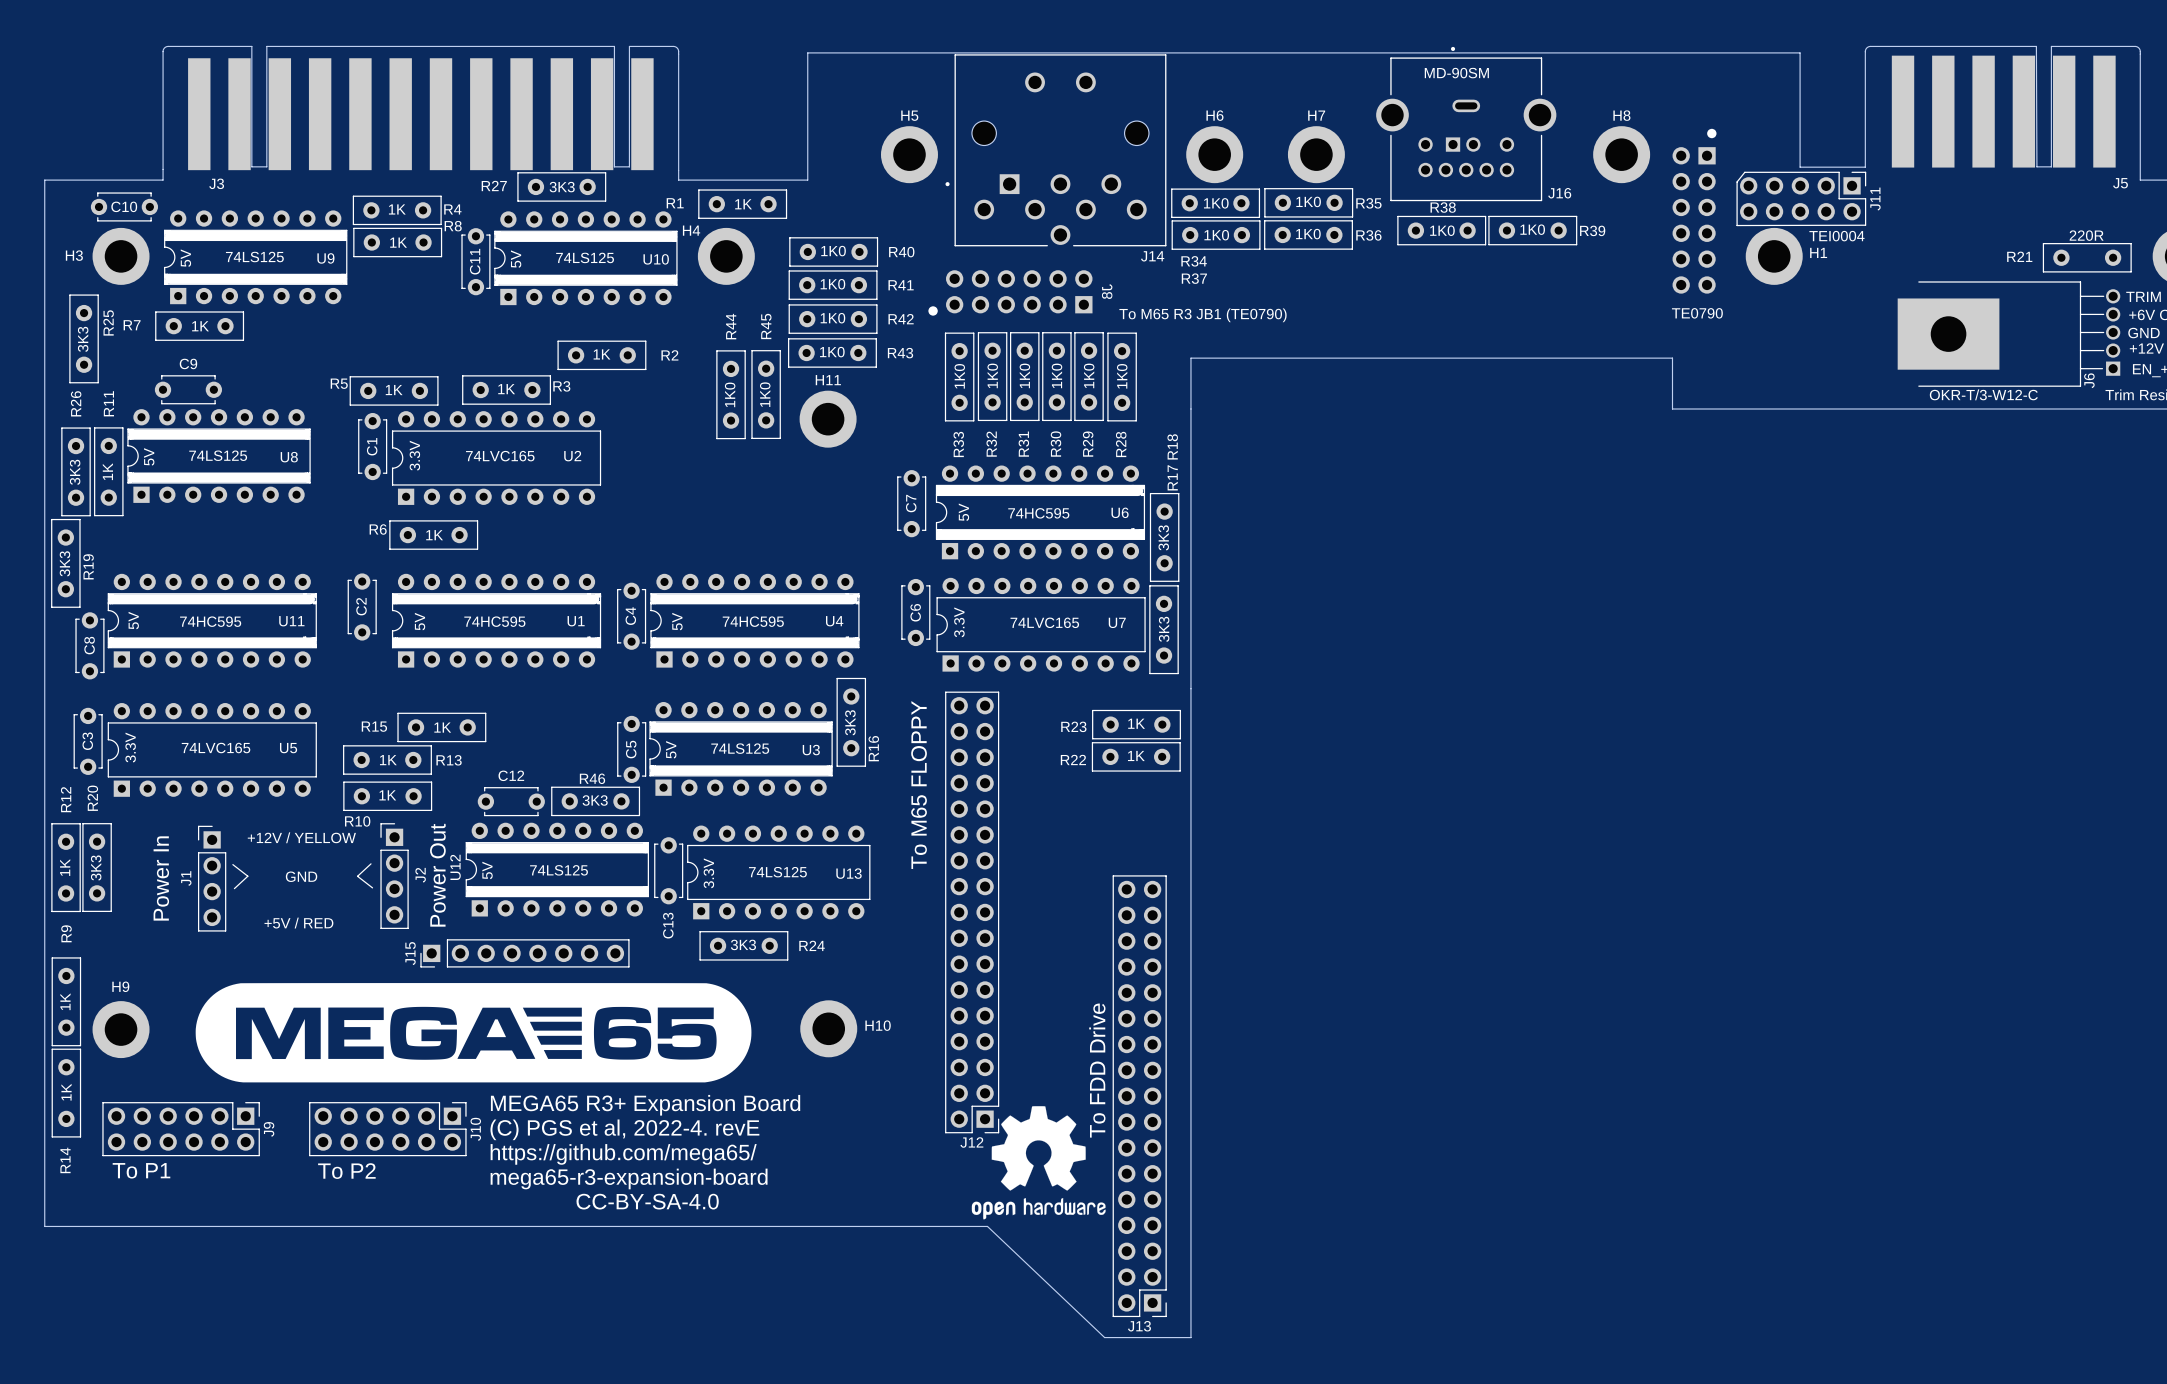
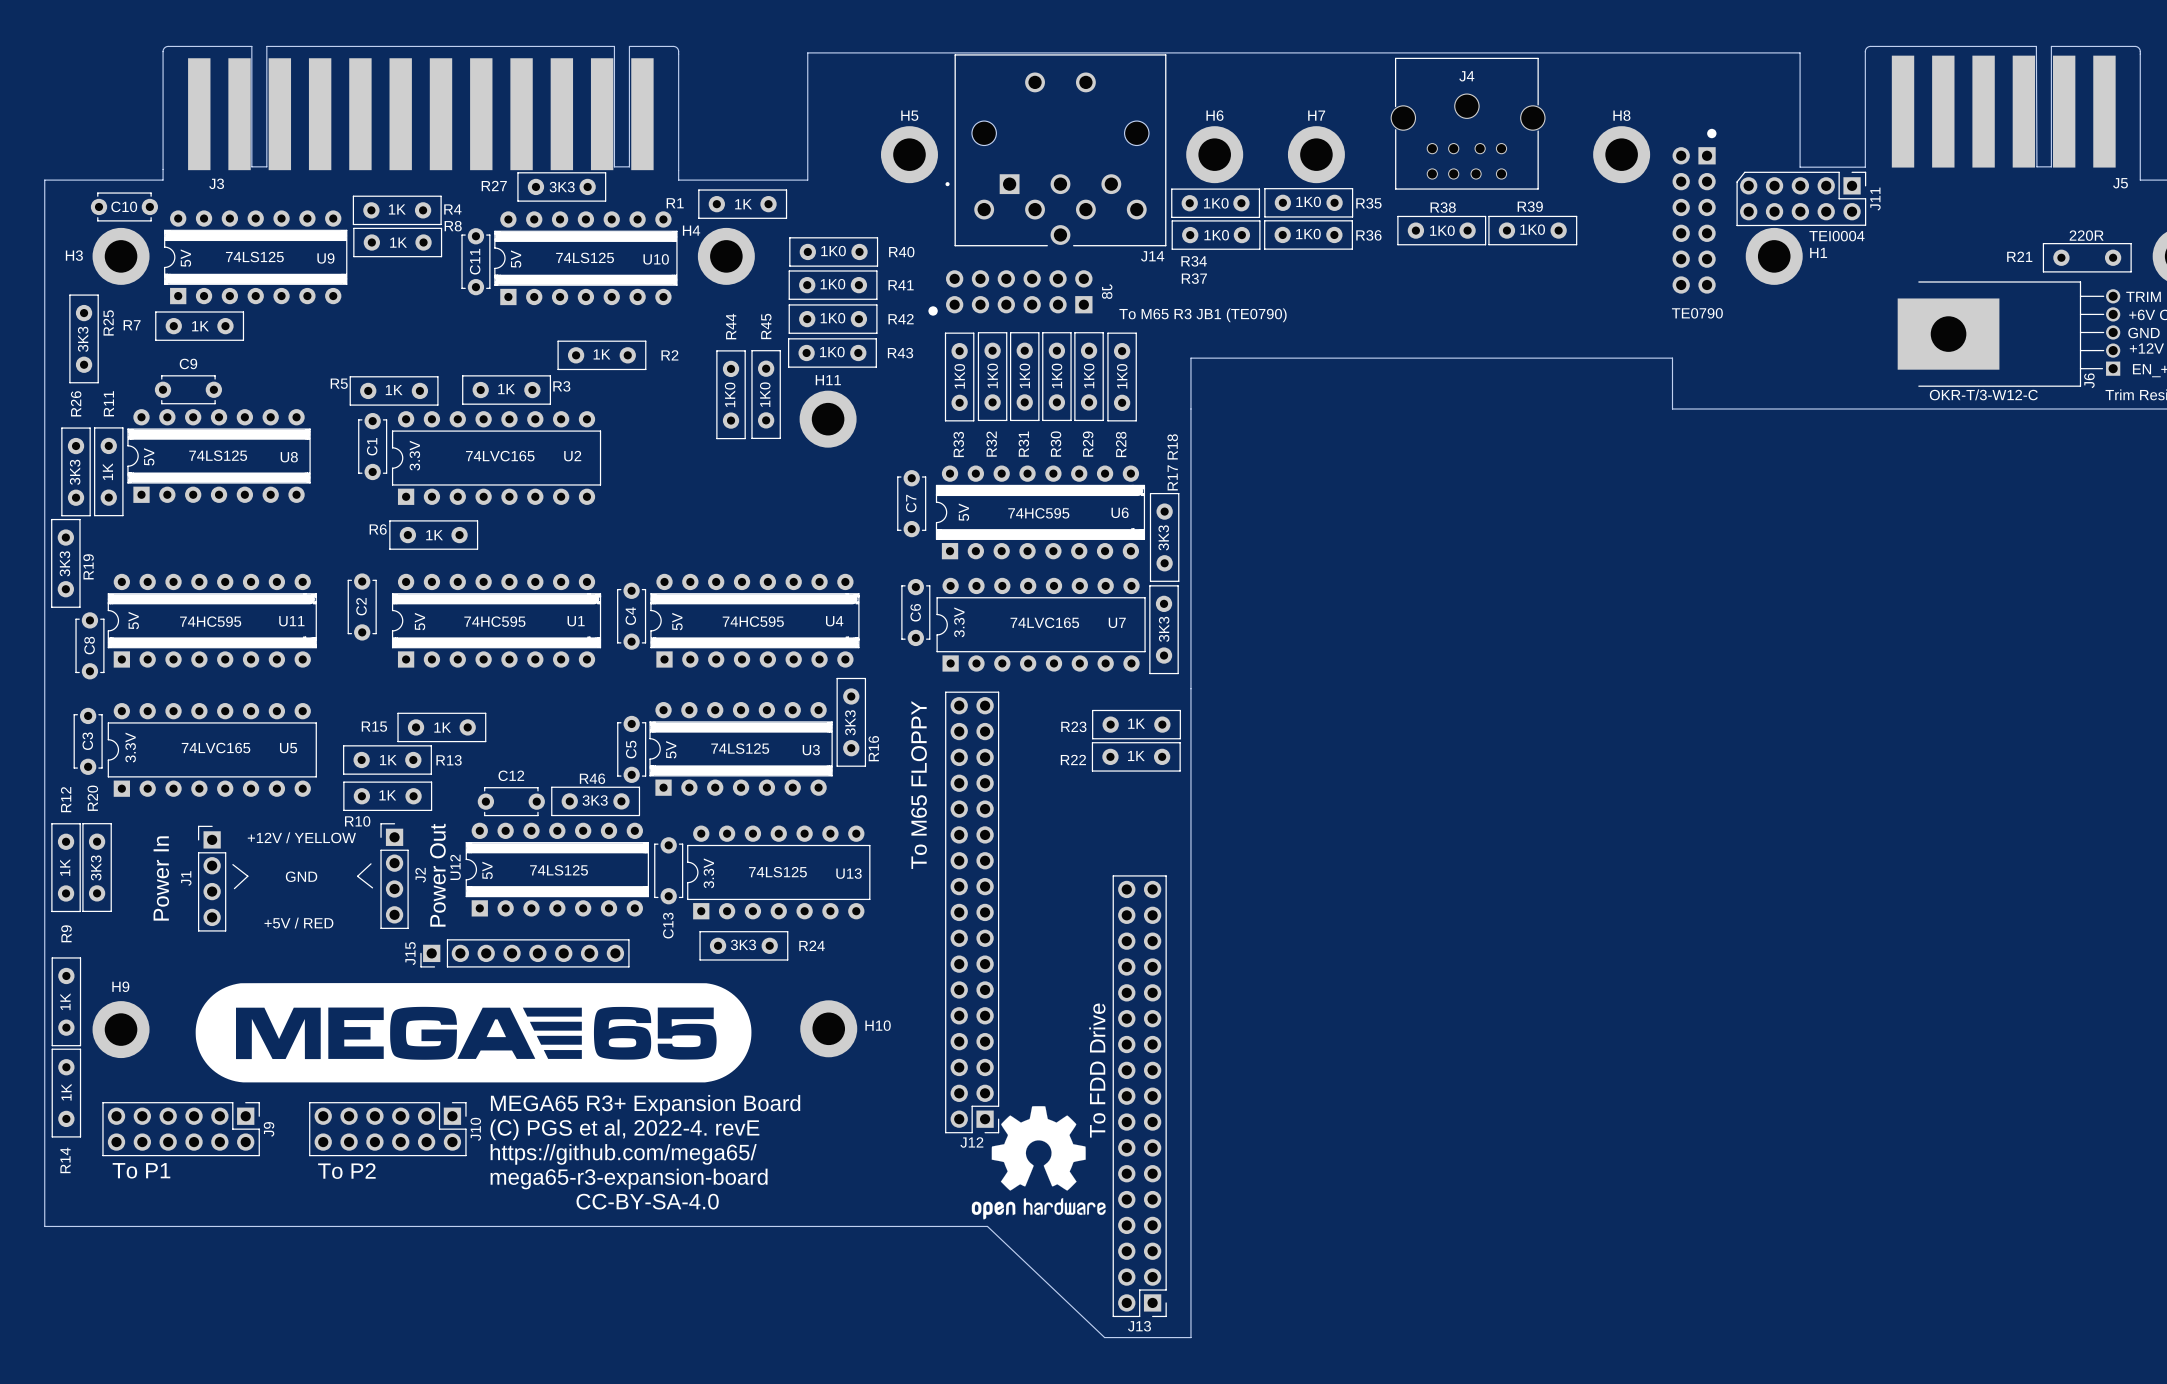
J4: none -> (1468, 123)
J16: MD-90SM (1466, 124) -> none
R39 name position: R39 (1592, 230) -> R39 (1530, 206)

